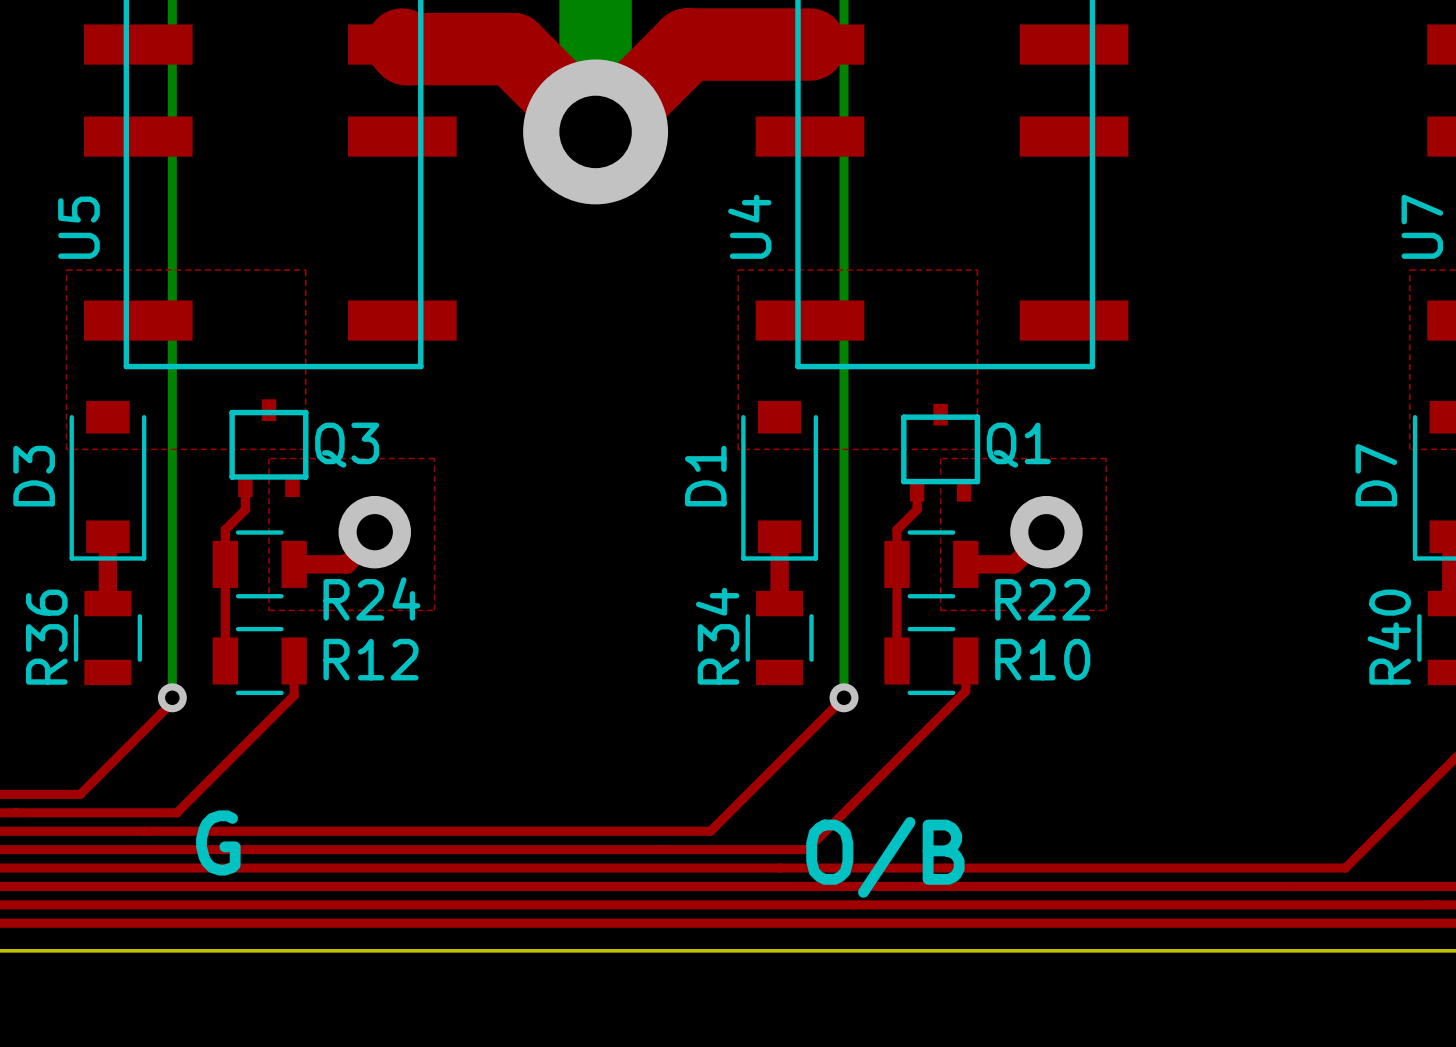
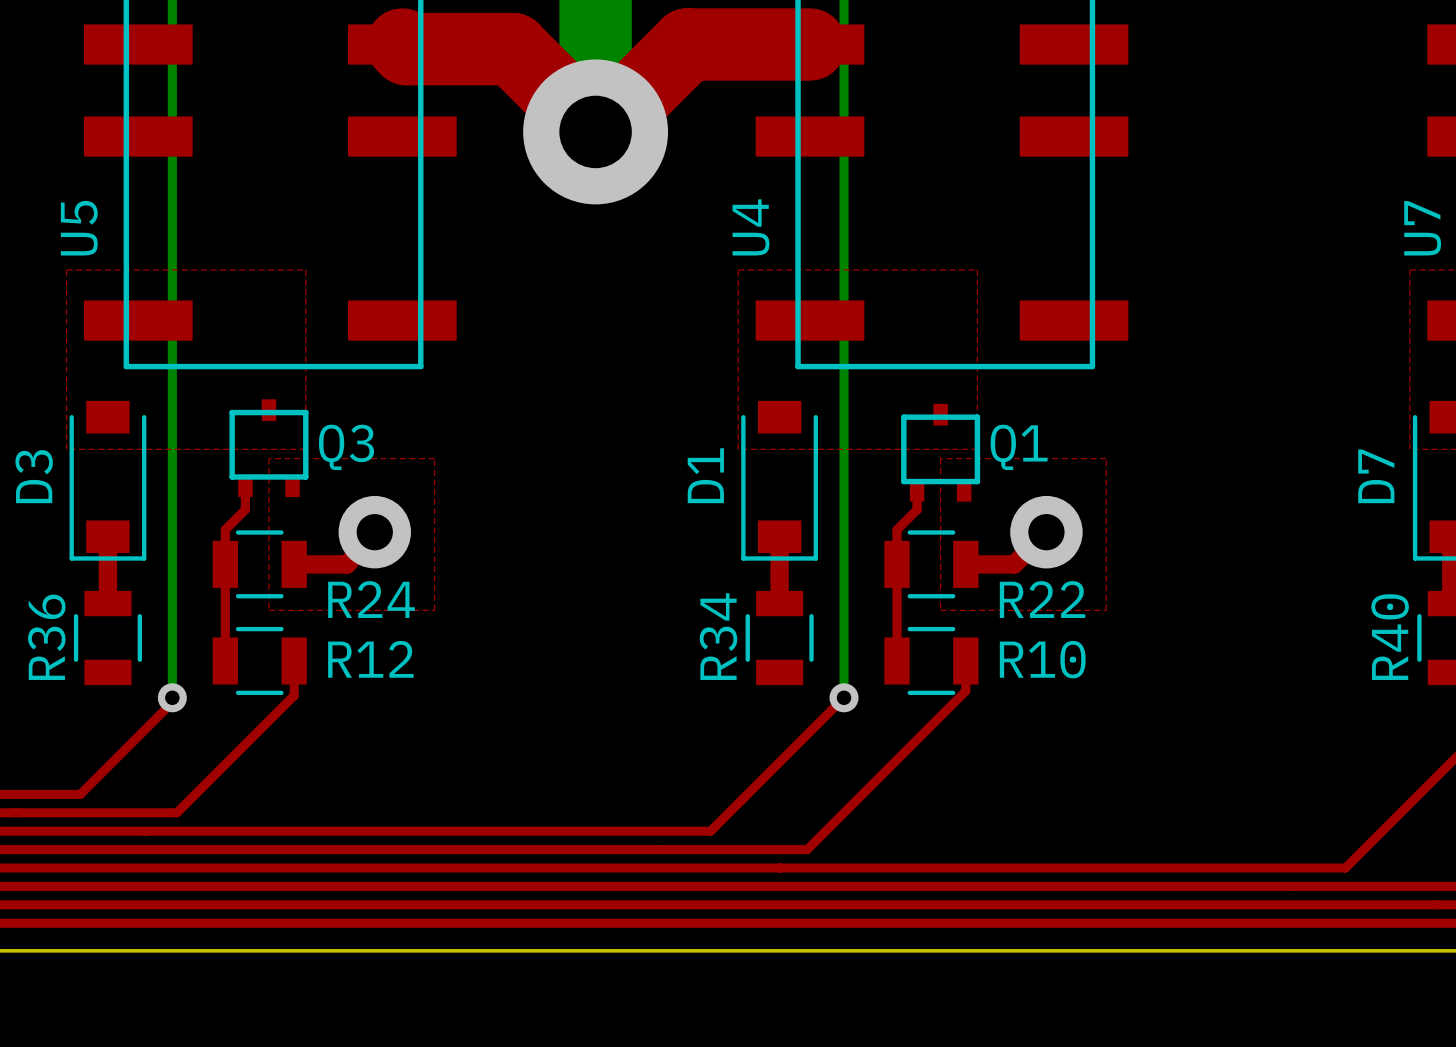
text: G (218, 842) -> none
text: O/B (885, 857) -> none

